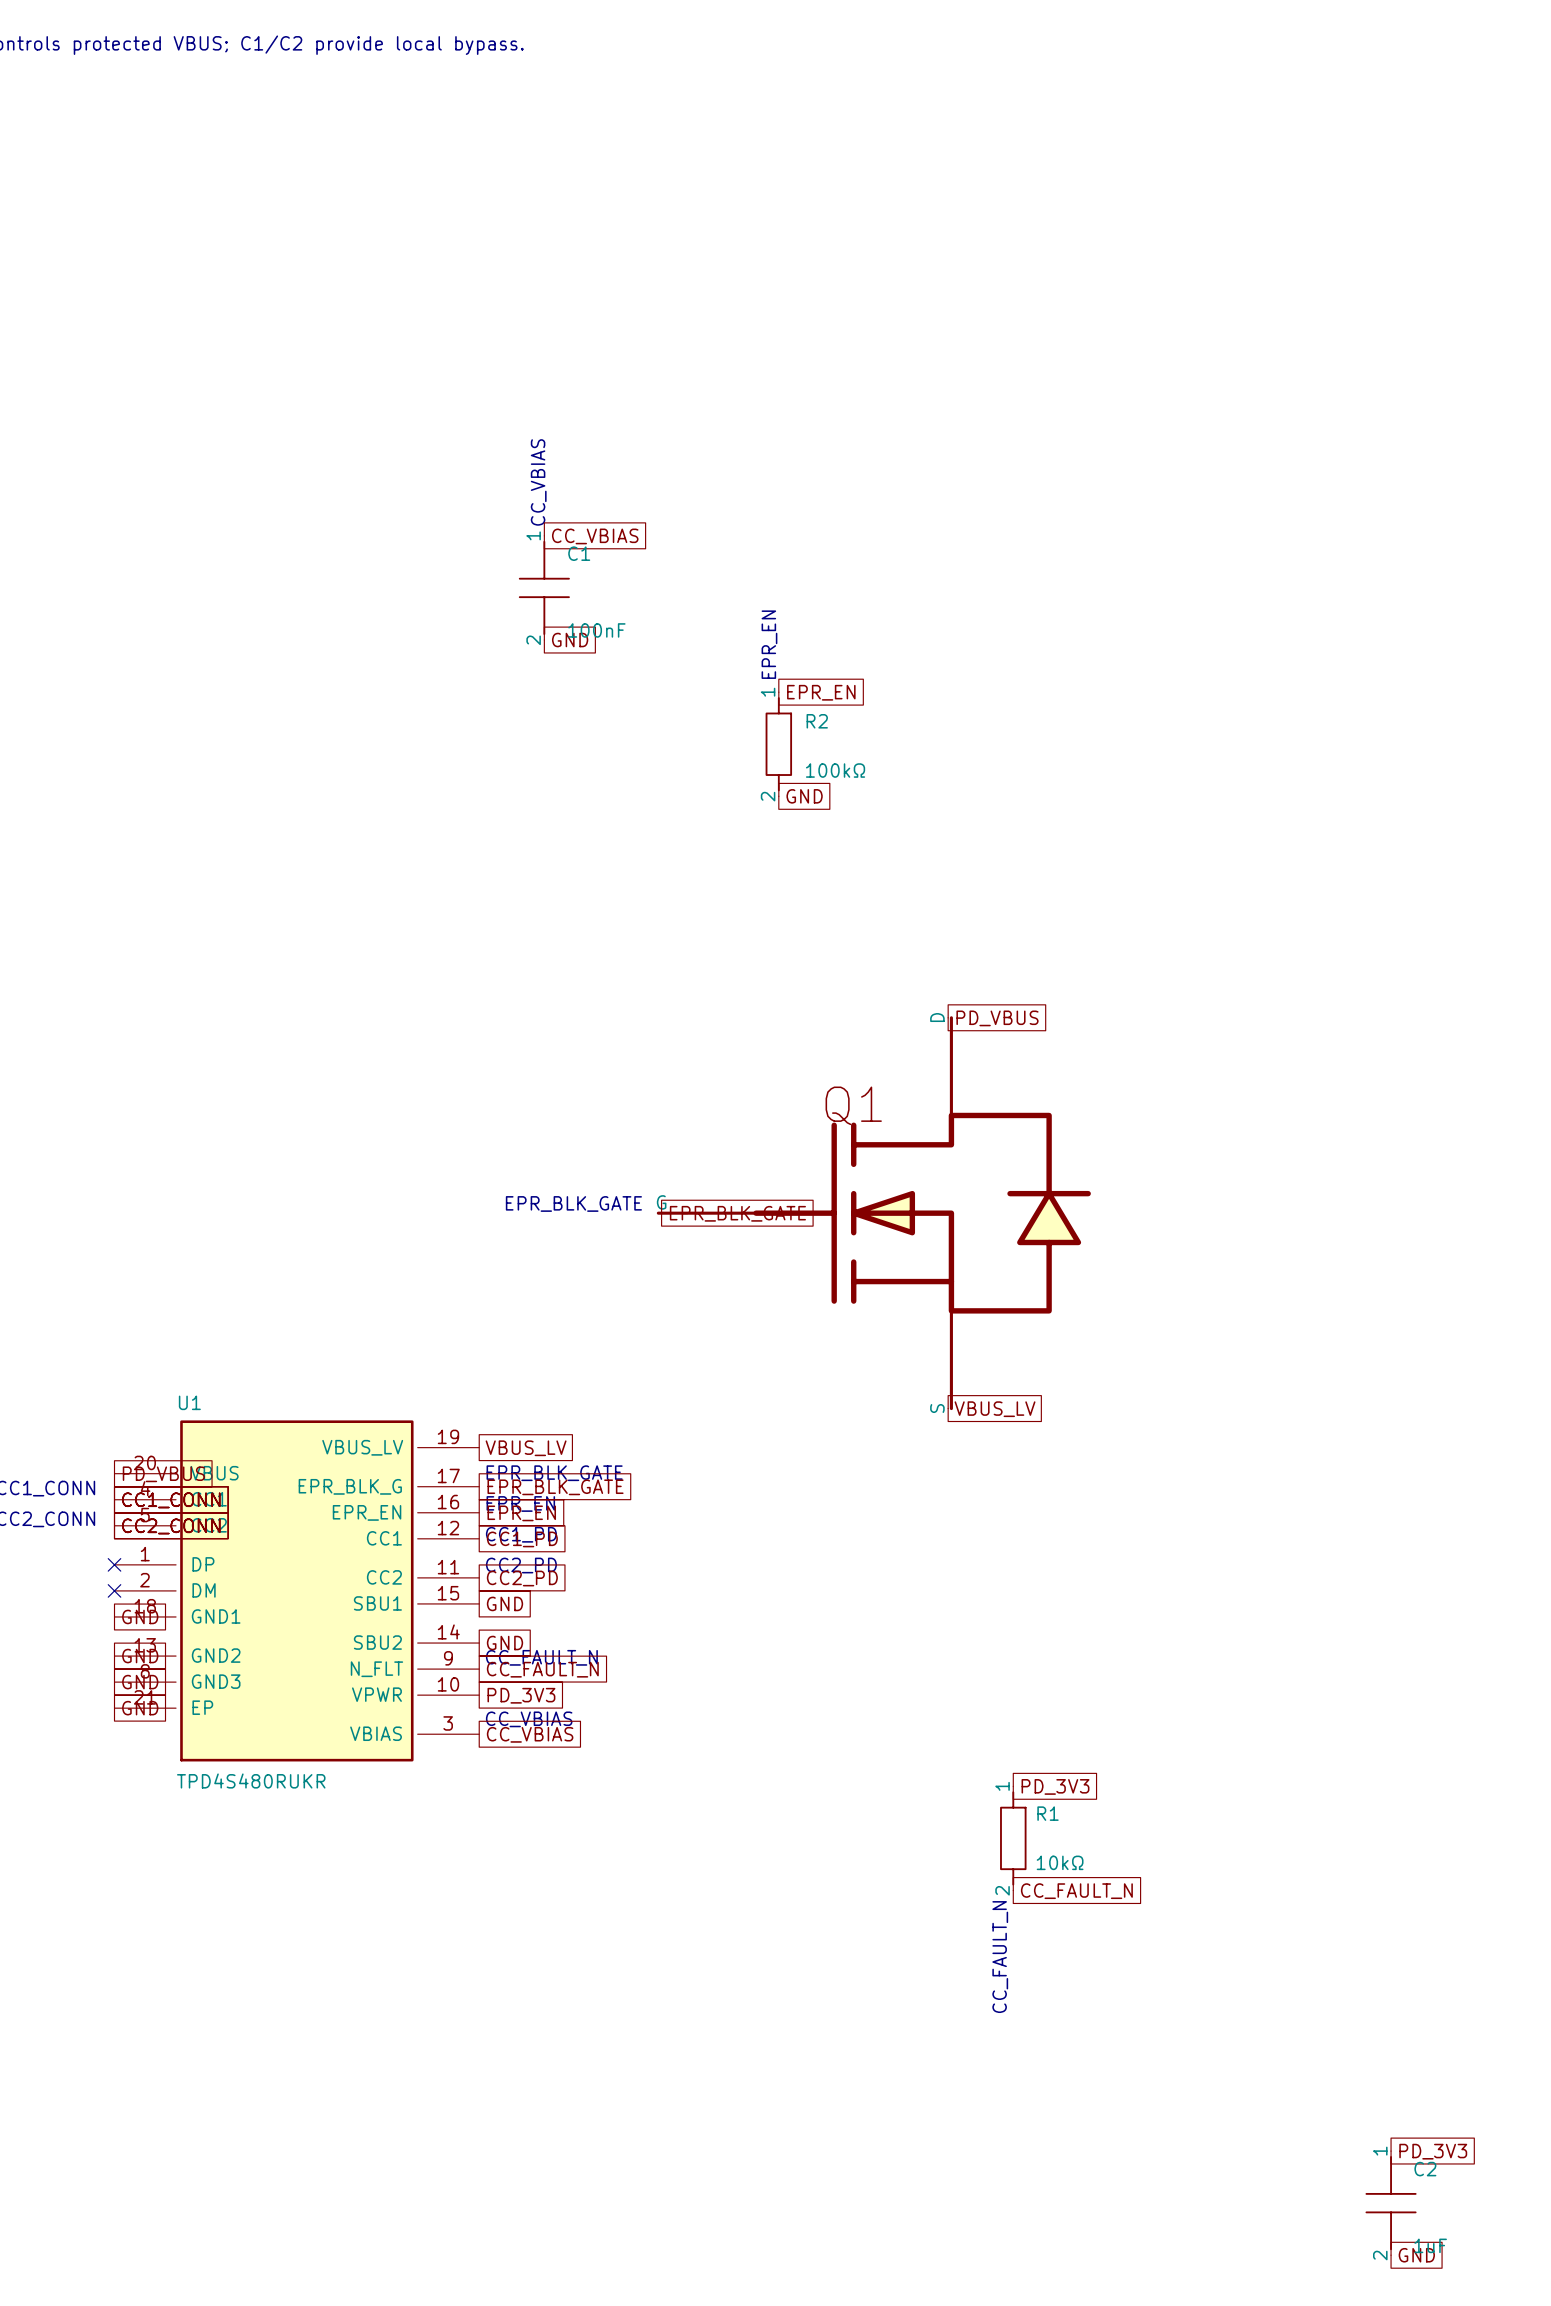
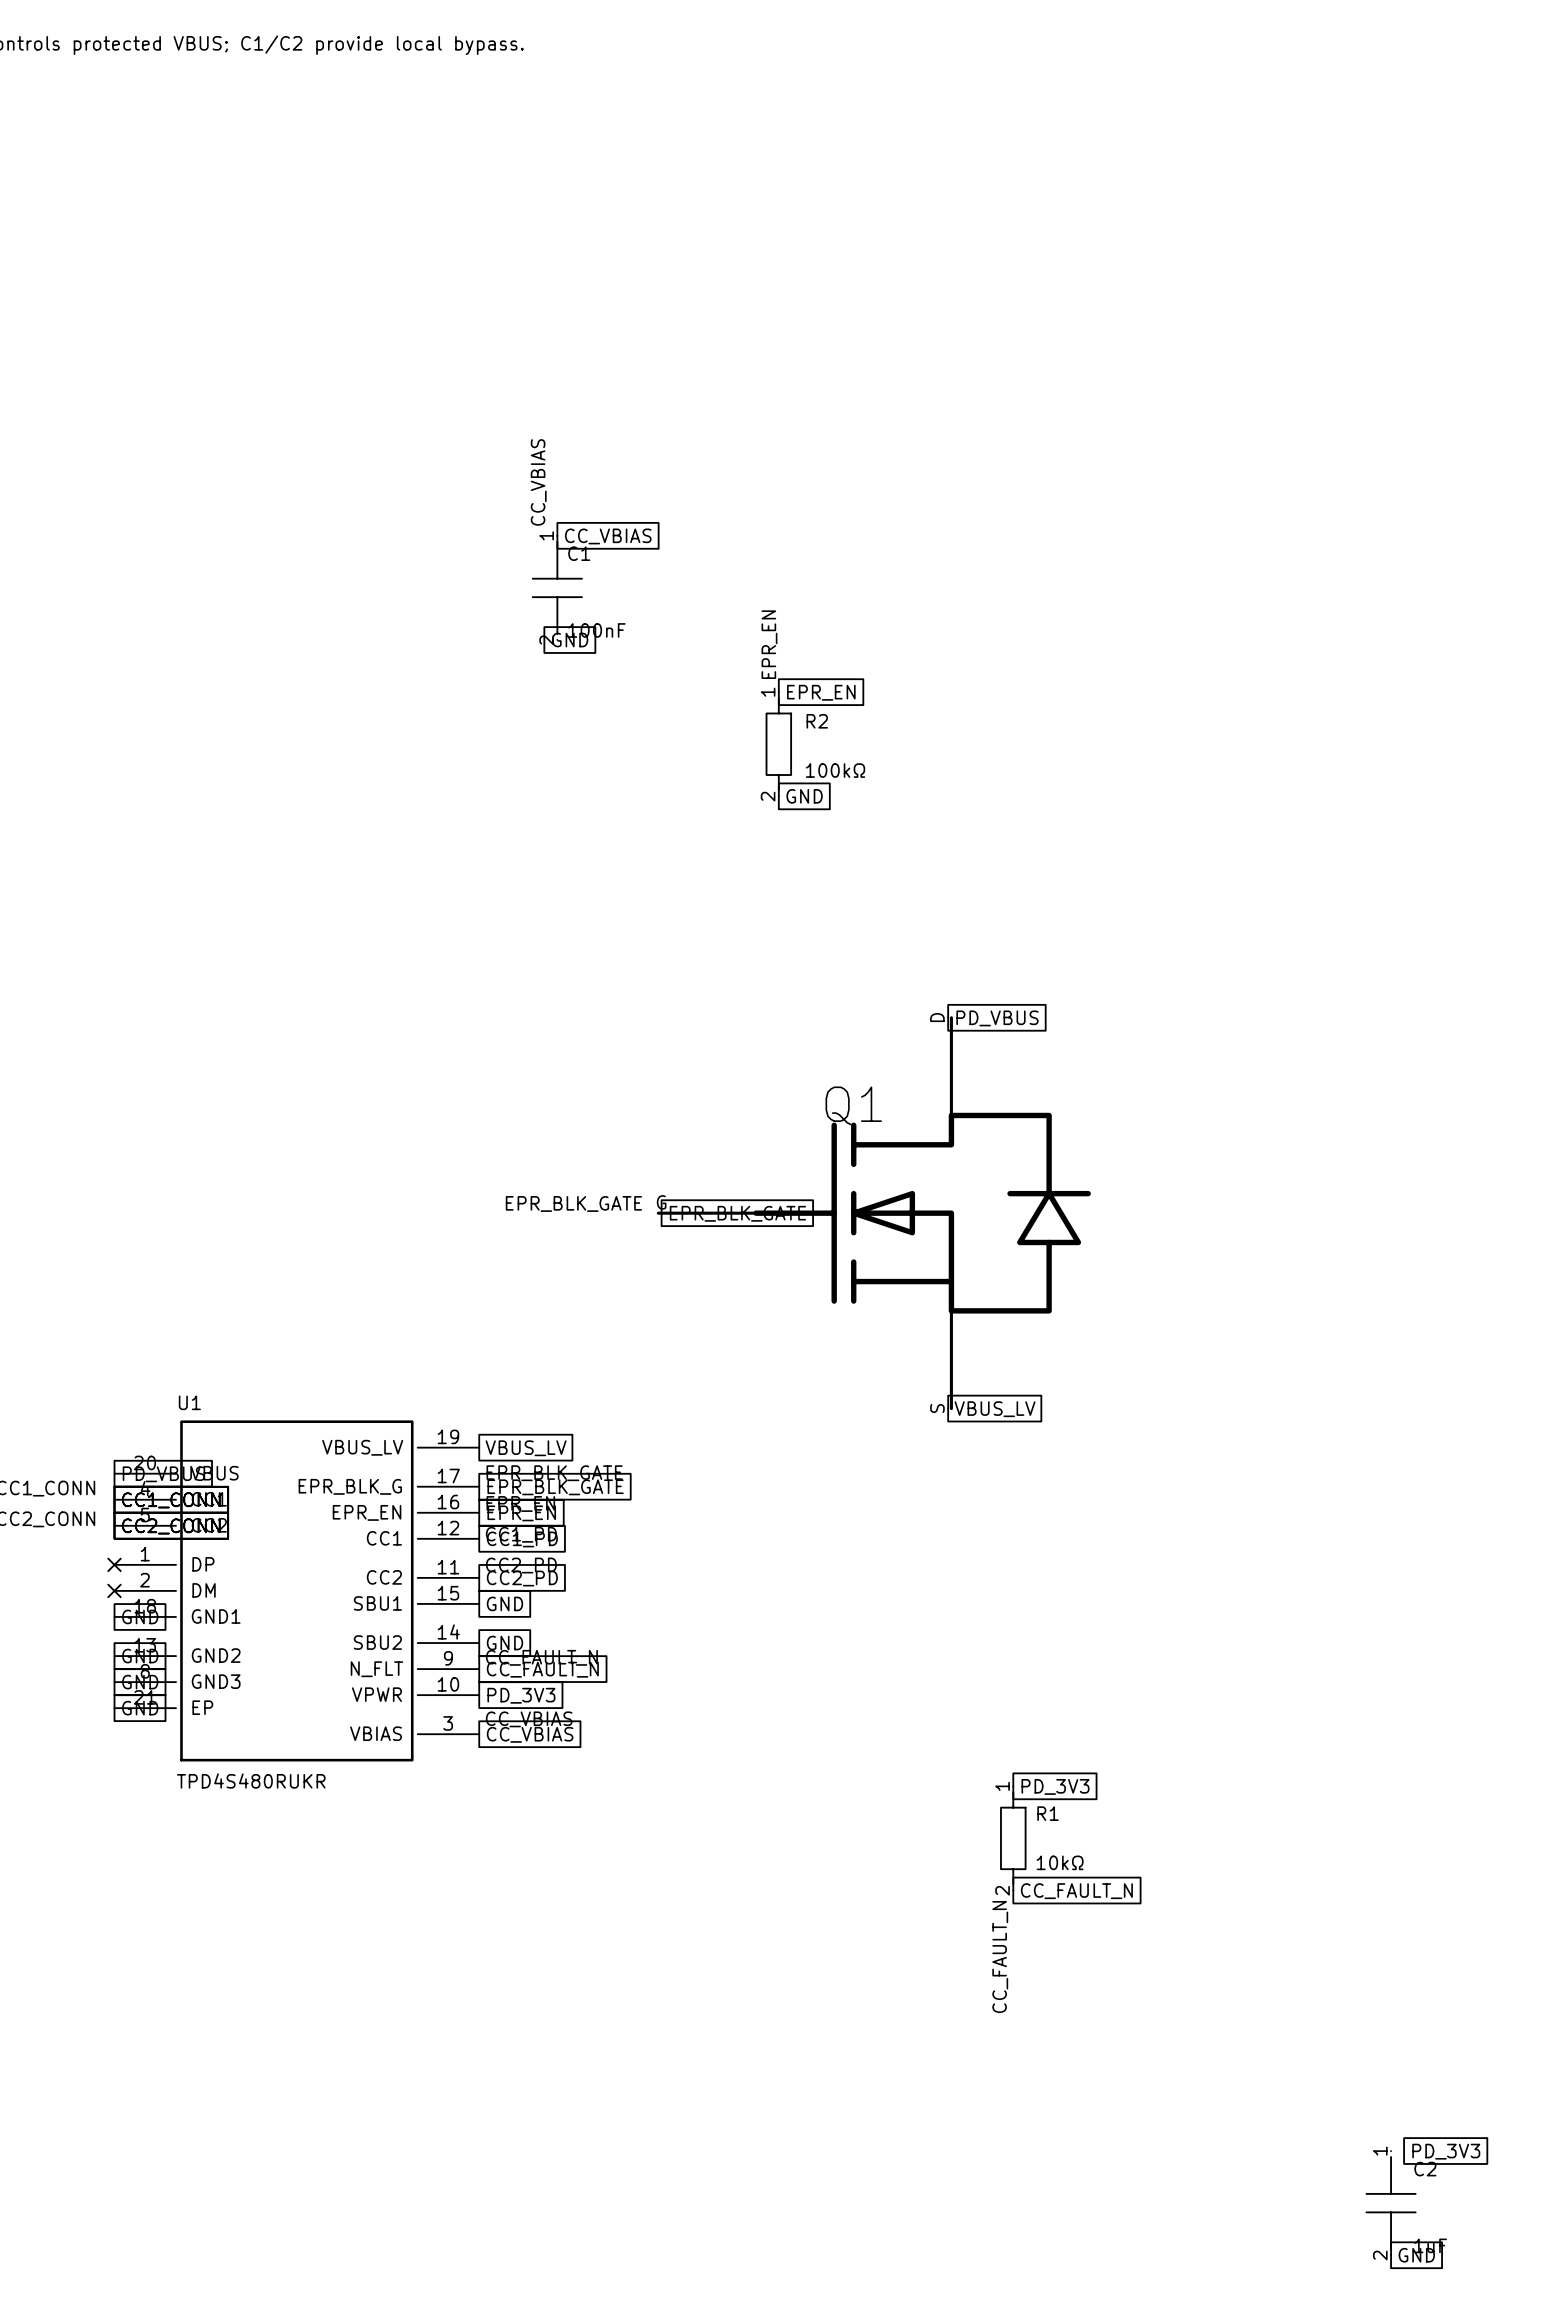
global label position: CC_VBIAS (595, 536) -> CC_VBIAS (608, 536)
C1 position: (544, 587) -> (557, 587)
global label position: PD_3V3 (1433, 2151) -> PD_3V3 (1446, 2151)

